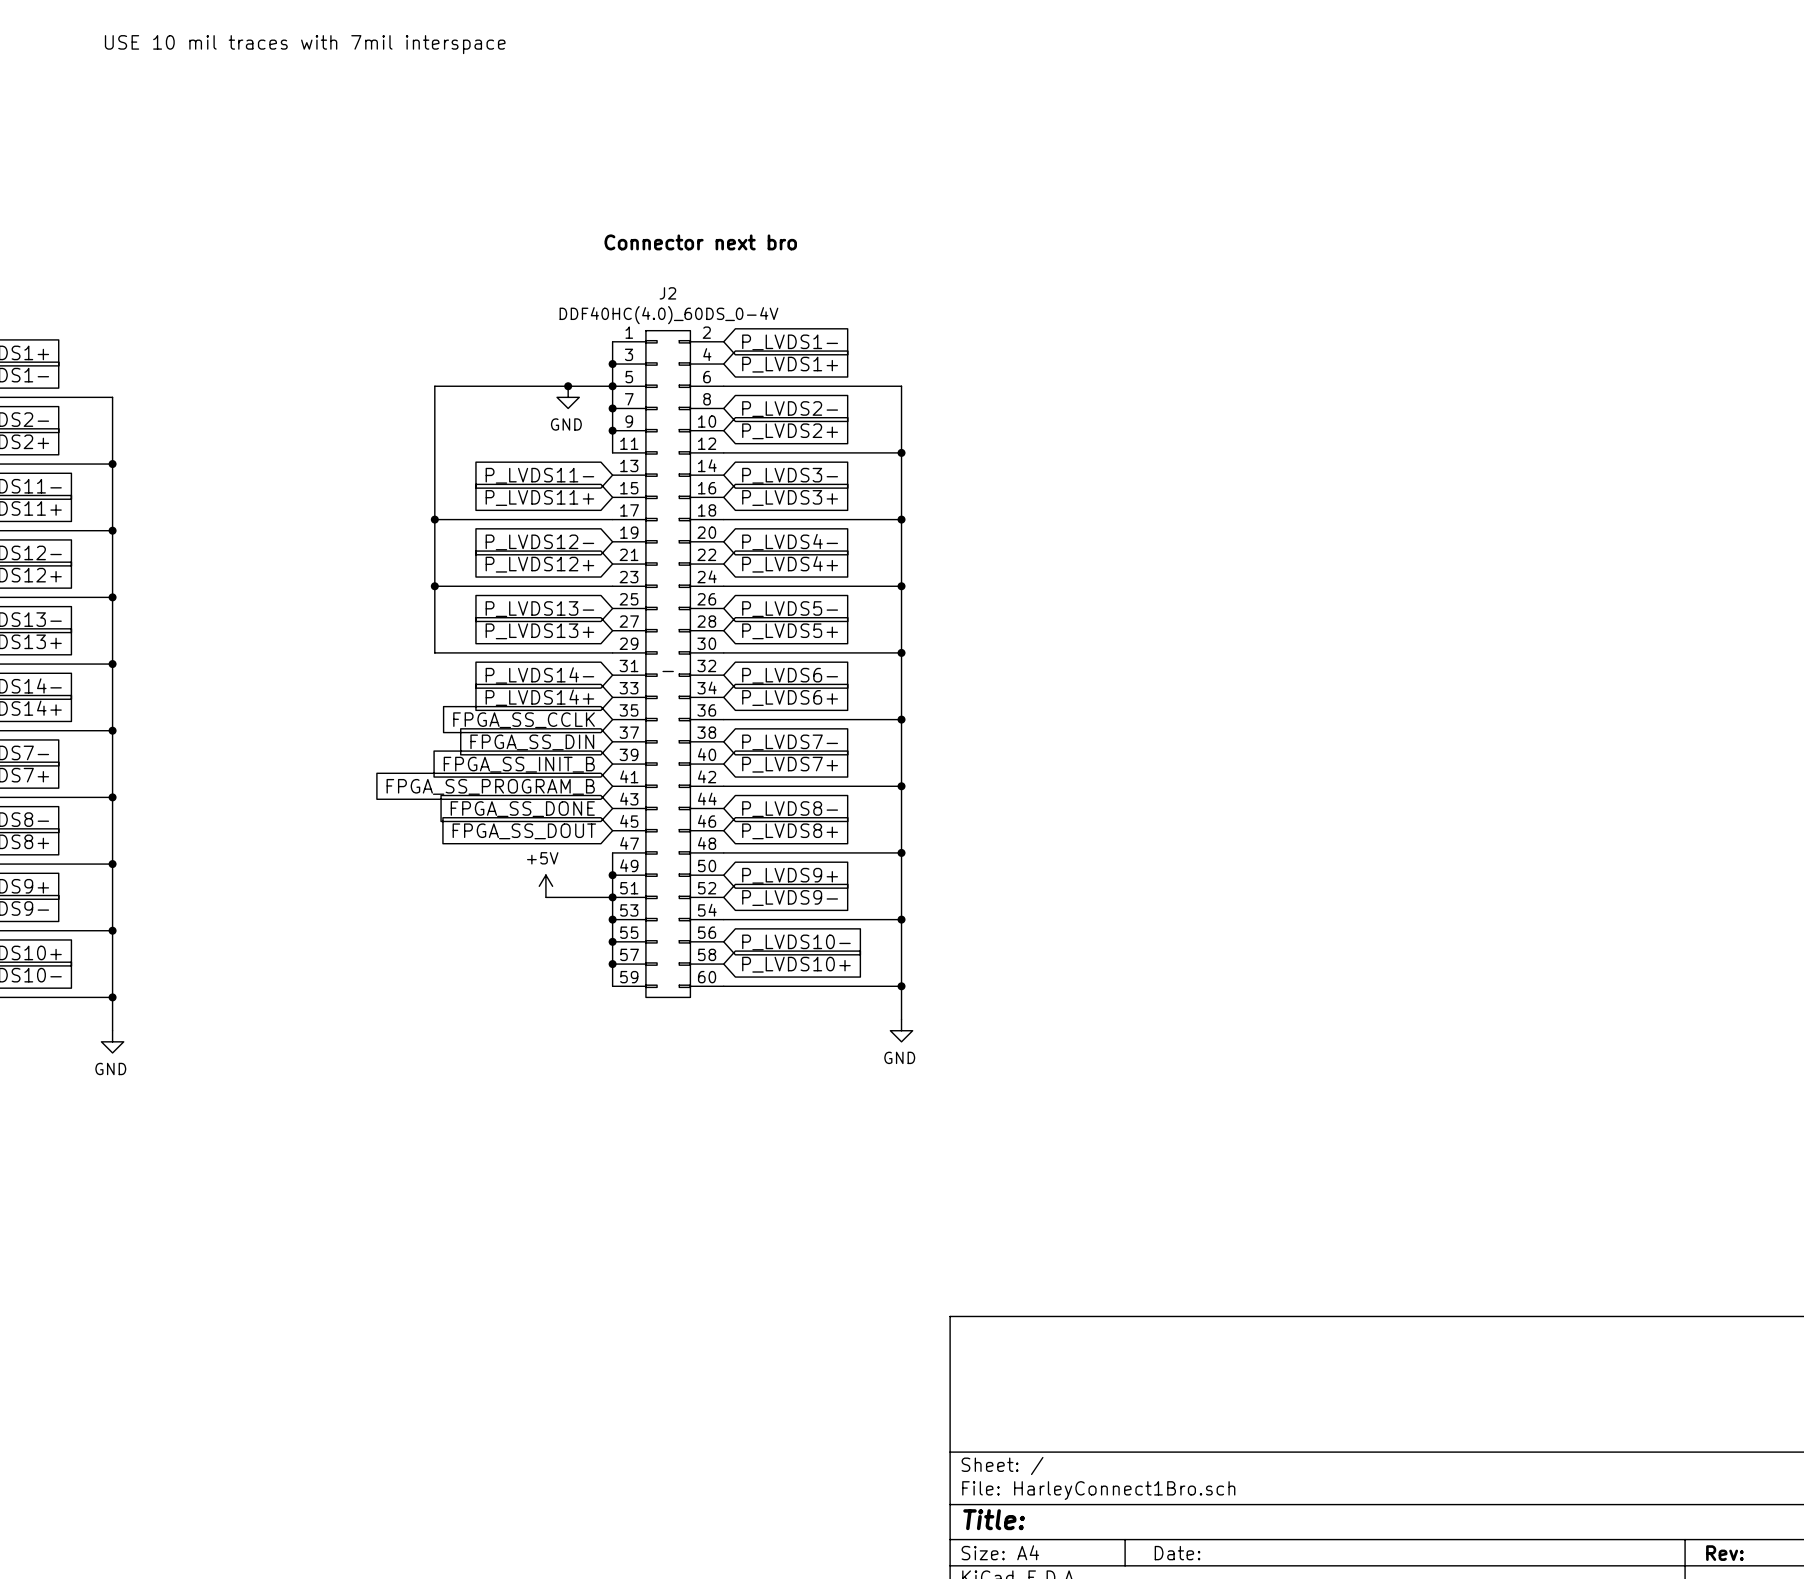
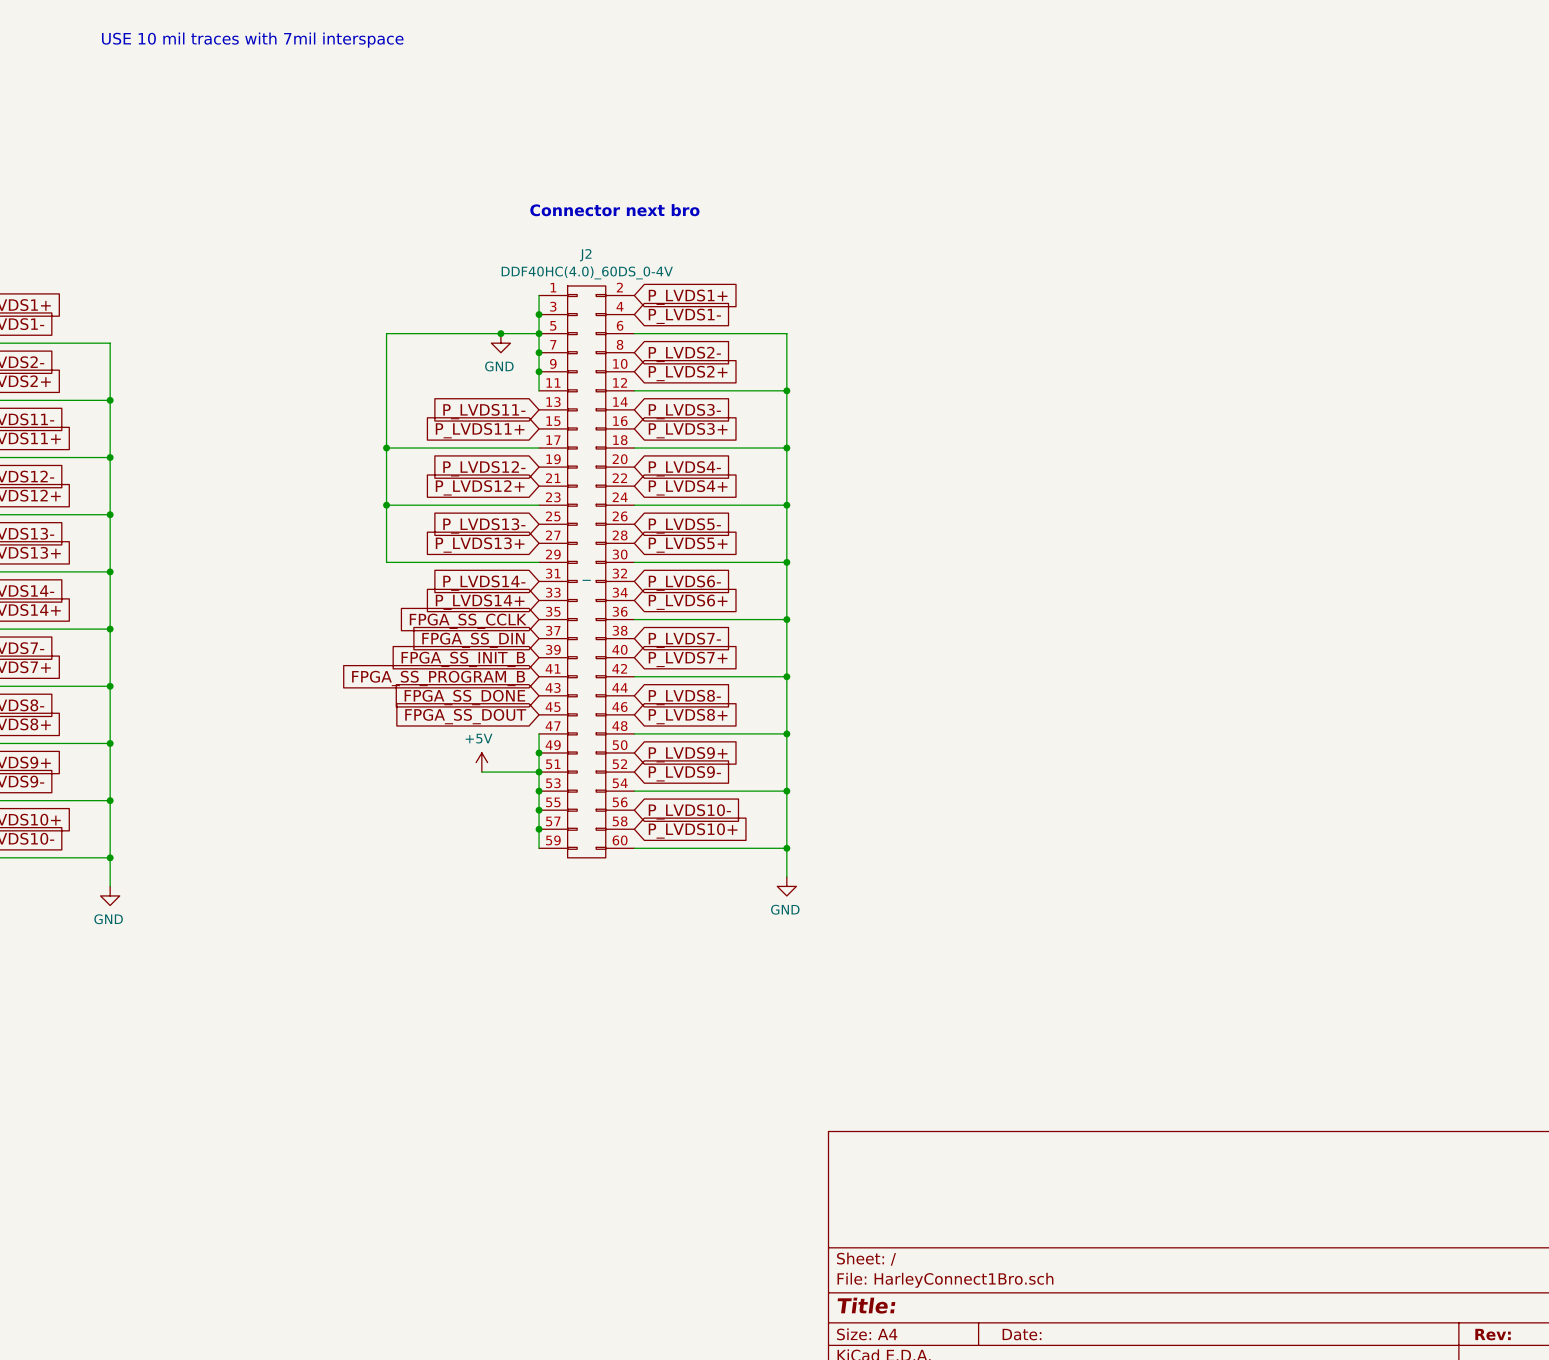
global label: P_LVDS1- (790, 342) -> P_LVDS1+ (688, 297)
global label: P_LVDS1+ (790, 364) -> P_LVDS1- (684, 316)

